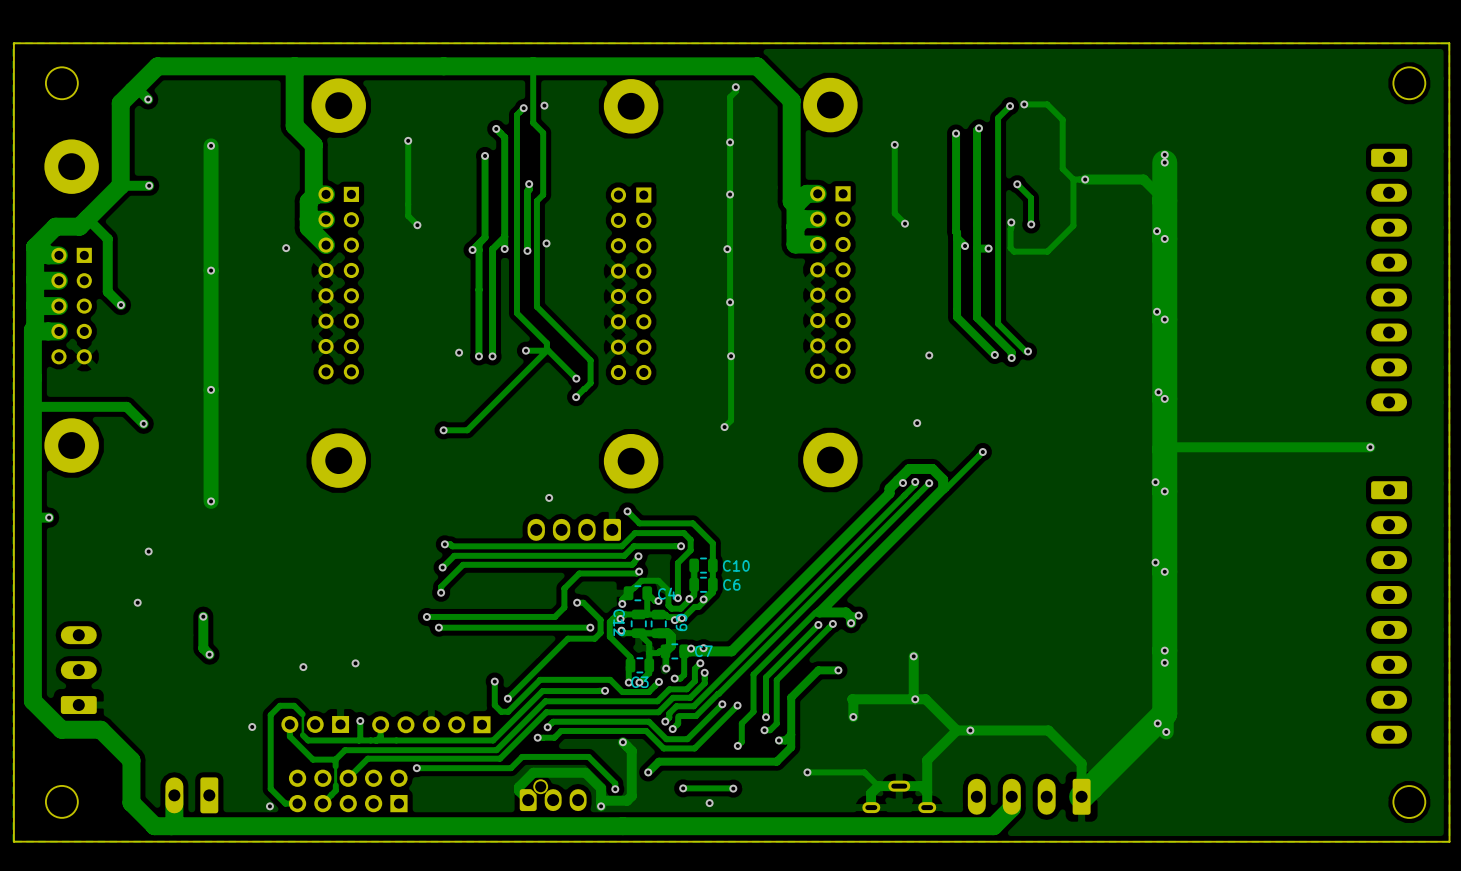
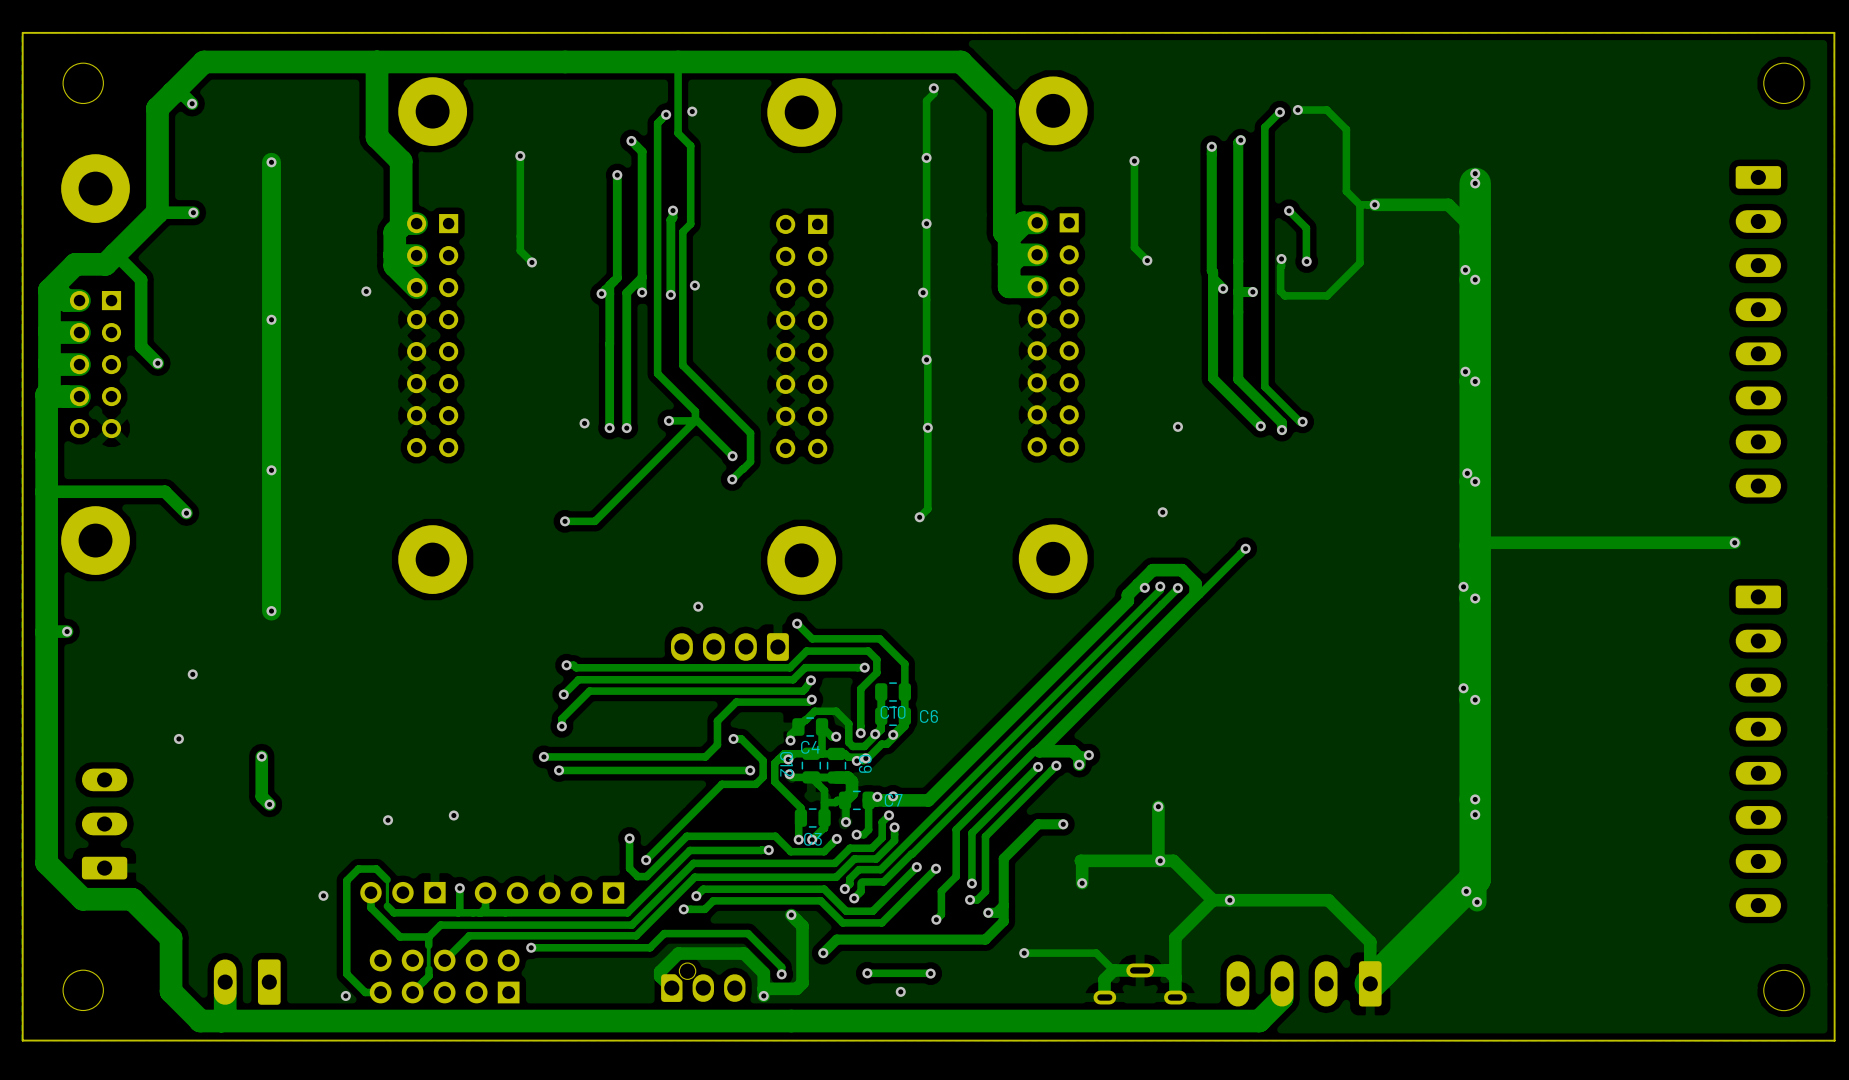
C10 name position: C10 (736, 565) -> C10 (893, 712)
C4 name position: C4 (666, 593) -> C4 (810, 747)

